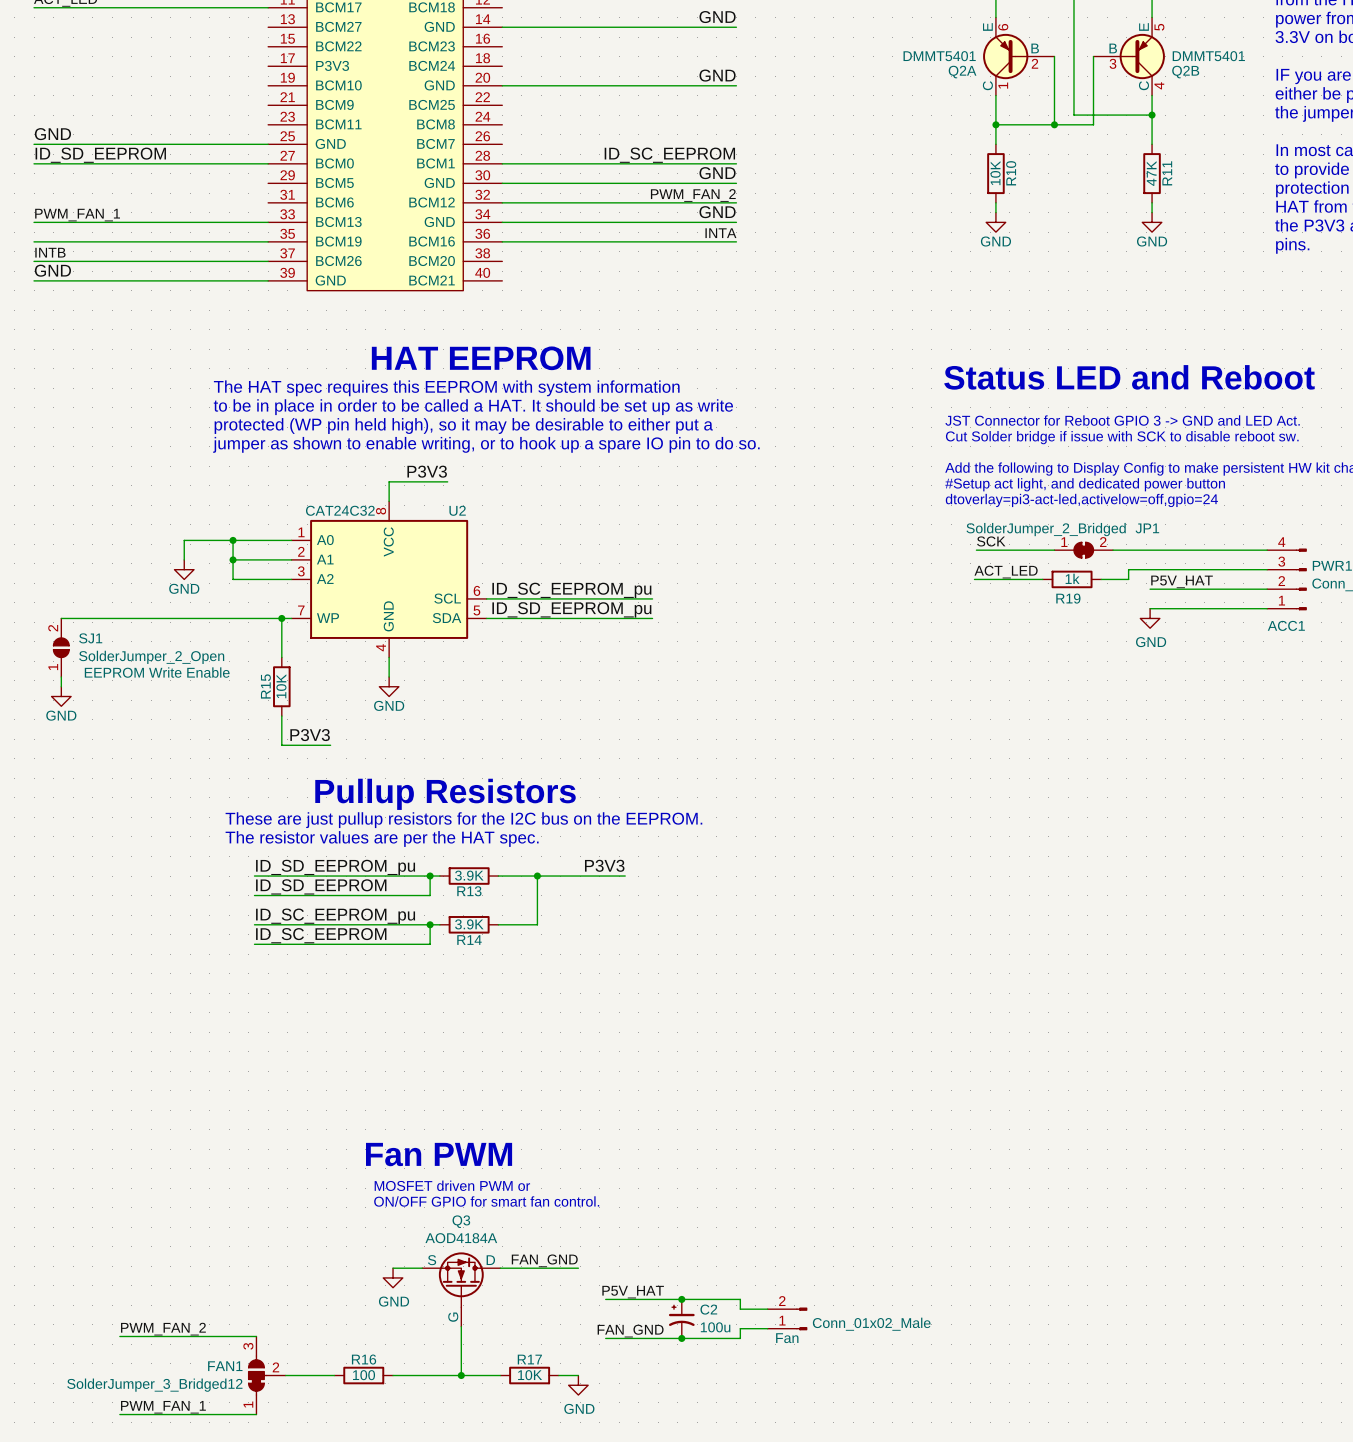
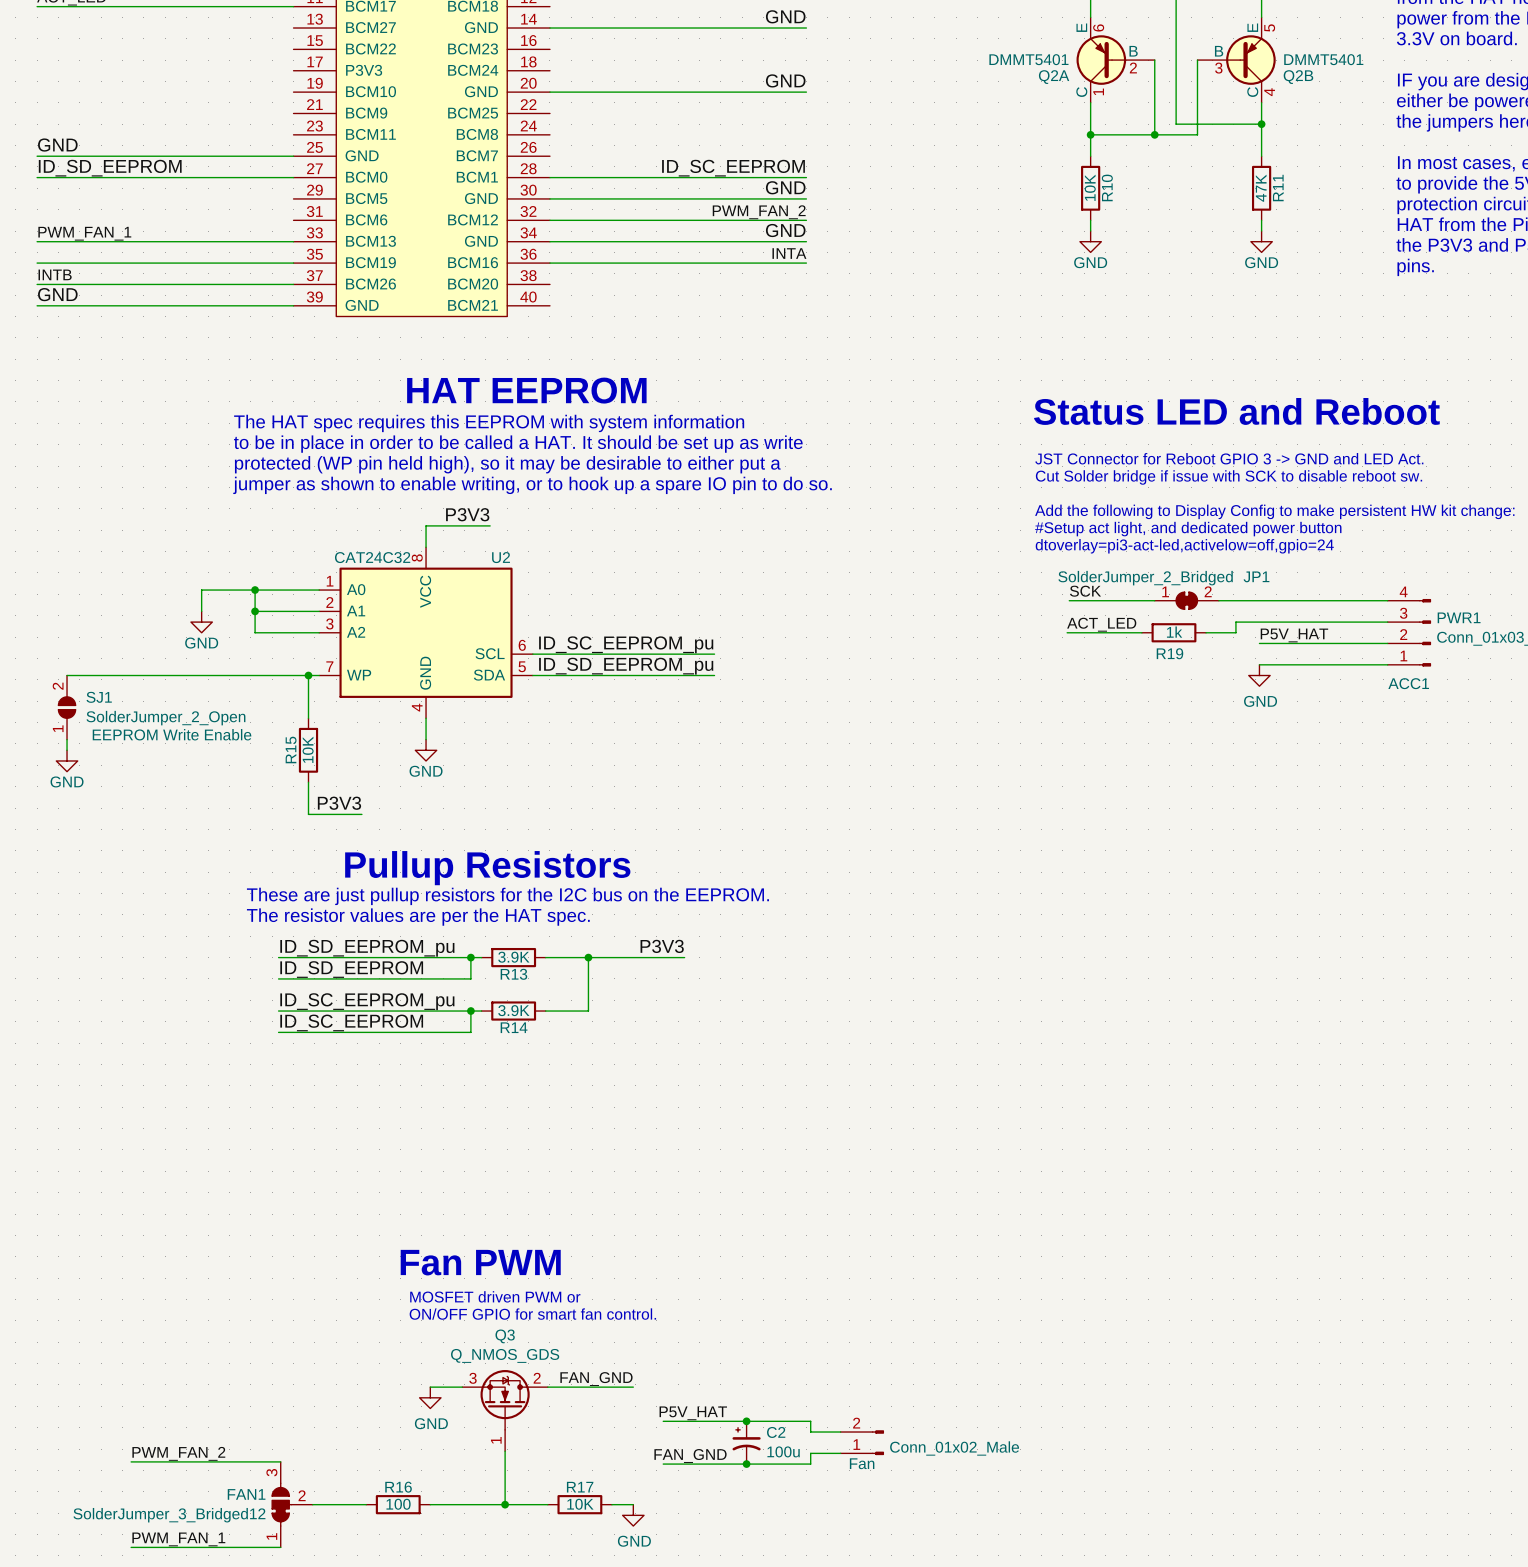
Q3 value: AOD4184A (461, 1238) -> Q_NMOS_GDS (505, 1355)
Q3 symbol: [422, 1252, 501, 1327] -> [462, 1370, 548, 1452]

